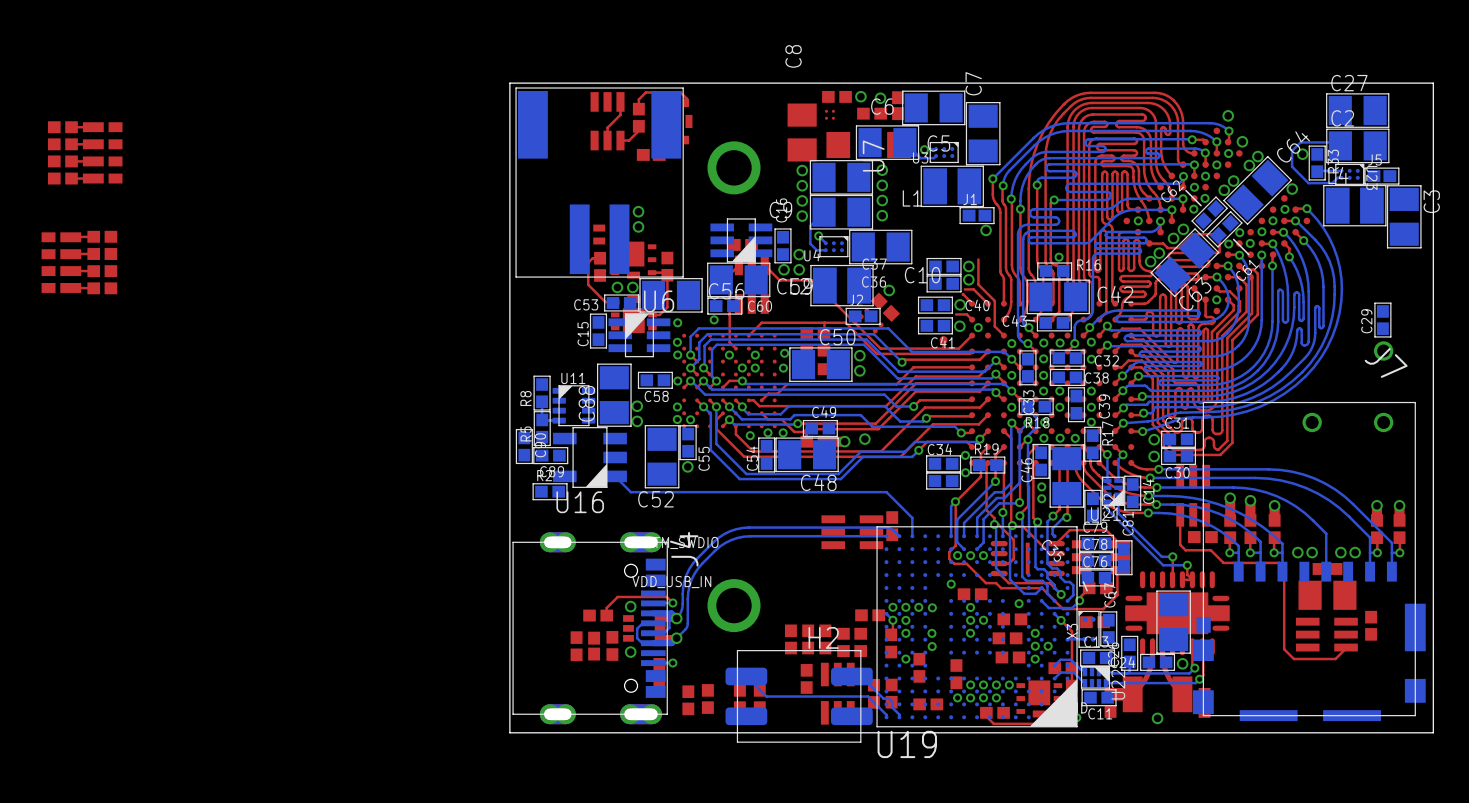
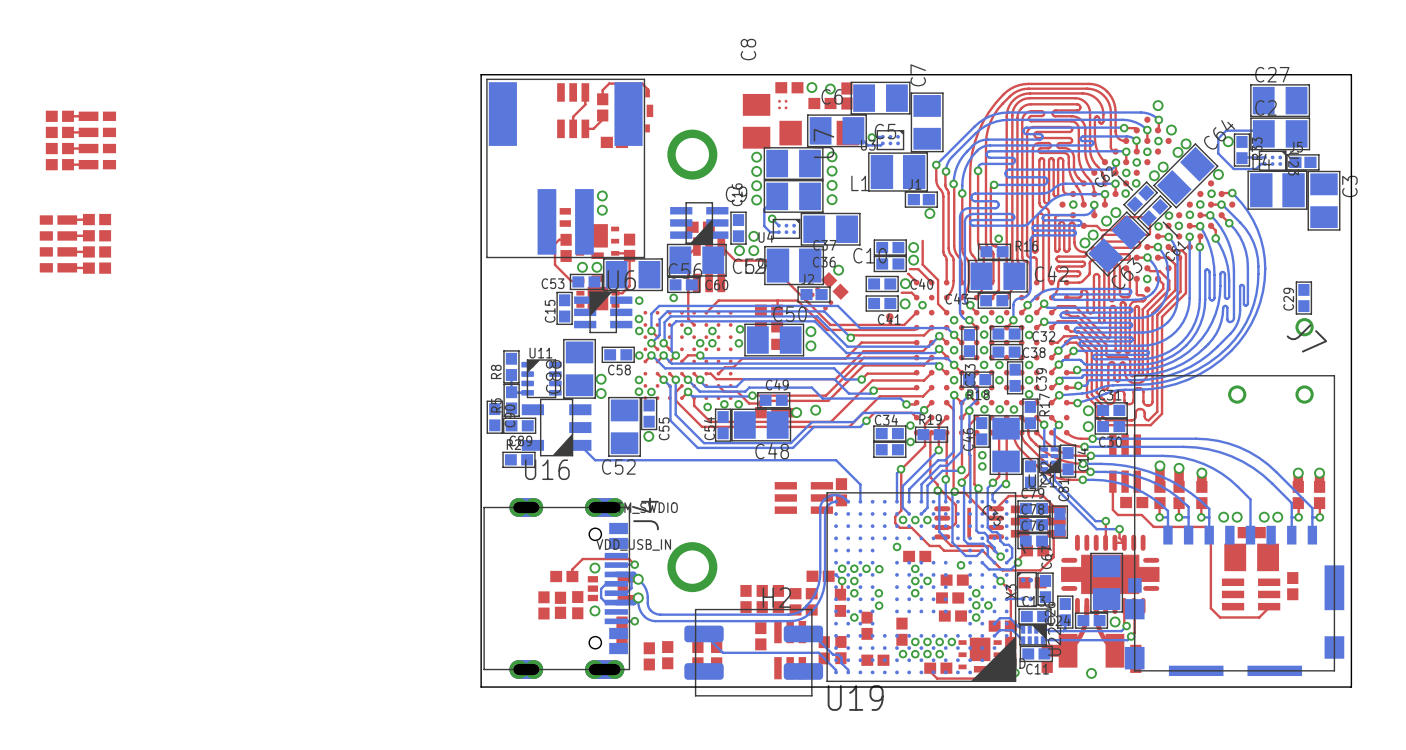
bottom track: (897, 533) (891, 529) (884, 527) (749, 527) (729, 531) (713, 542) (689, 568) (683, 587) (682, 609) (676, 618) -> (845, 499) (839, 495) (833, 495) (826, 498) (821, 504) (818, 584) (810, 601) (797, 612) (788, 614) (657, 614) (649, 608) (646, 589) (638, 579)
bottom track: (886, 536) (750, 536) (731, 540) (714, 551) (694, 573) (688, 592) (687, 625) (676, 638) -> (836, 501) (828, 504) (825, 512) (823, 590) (815, 607) (801, 618) (790, 621) (653, 620) (645, 617) (641, 612) (638, 597)

